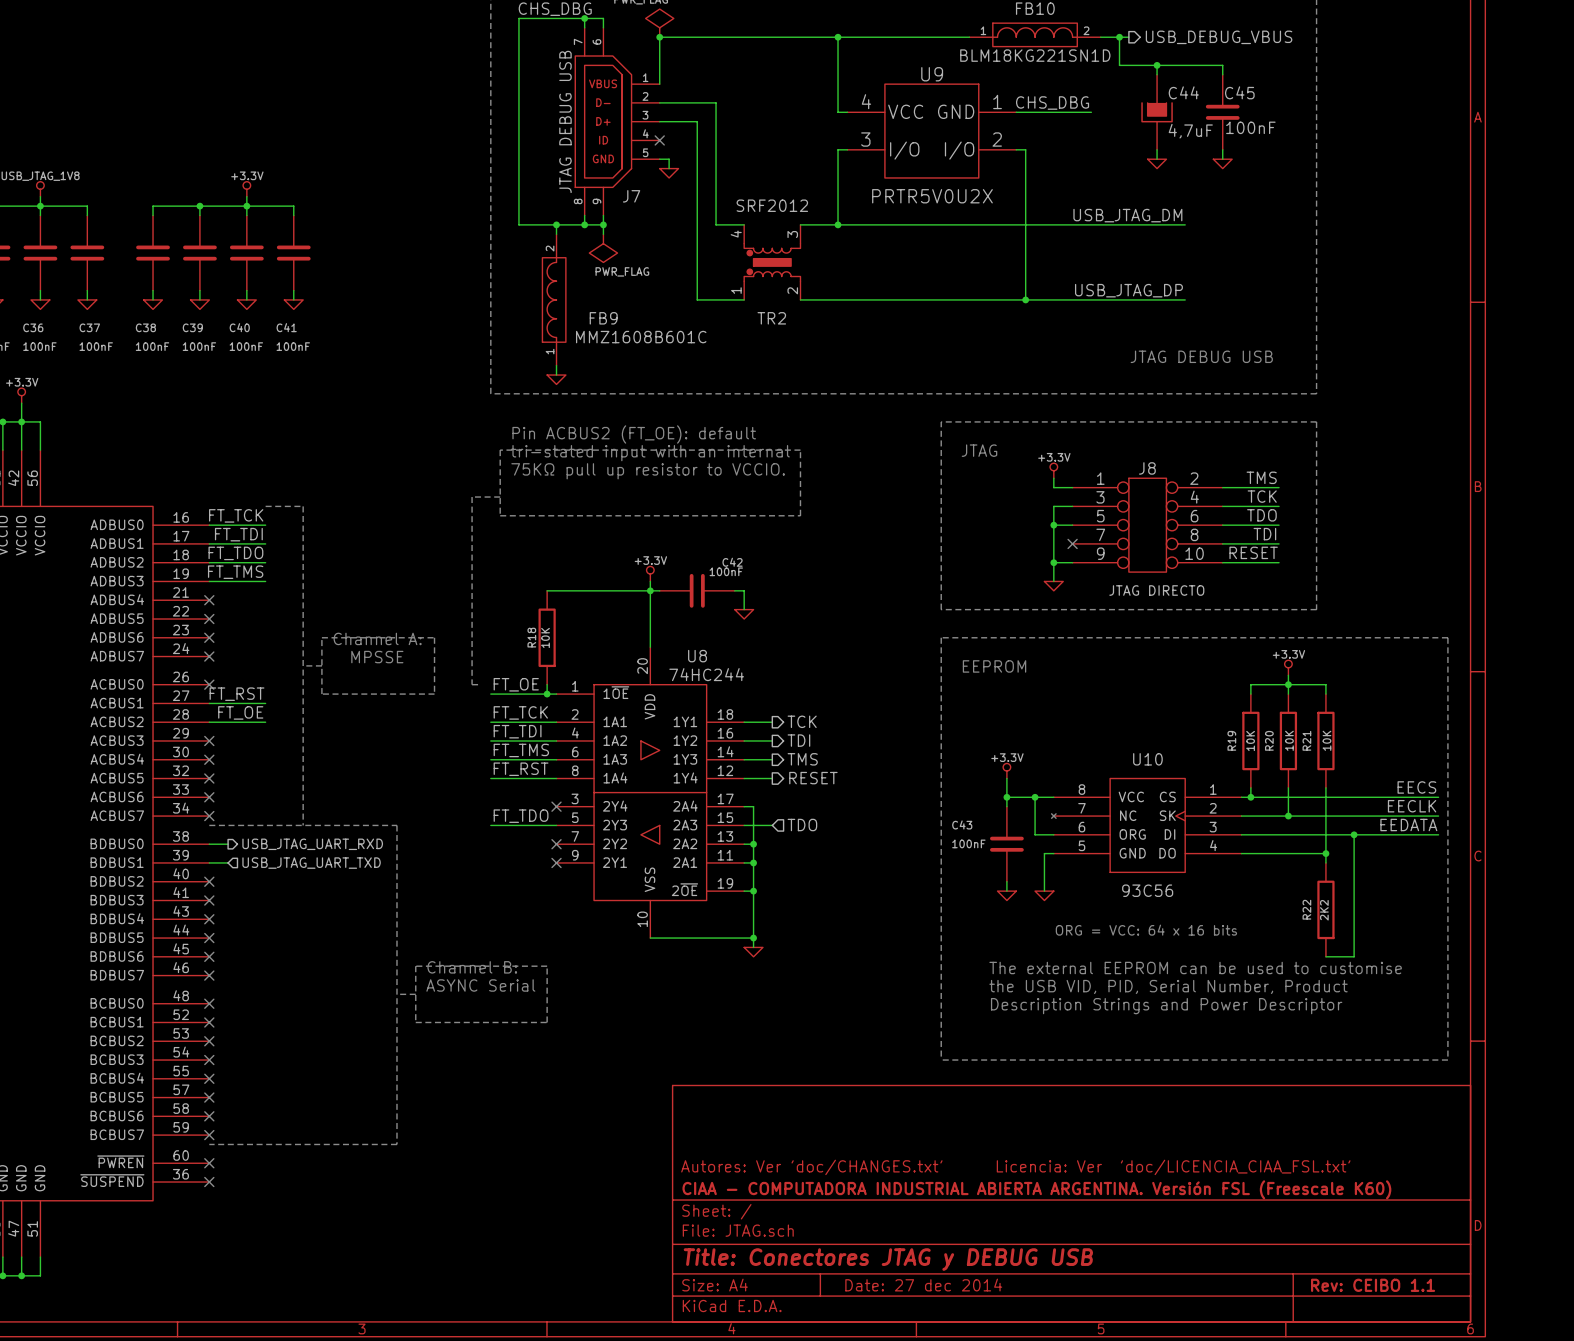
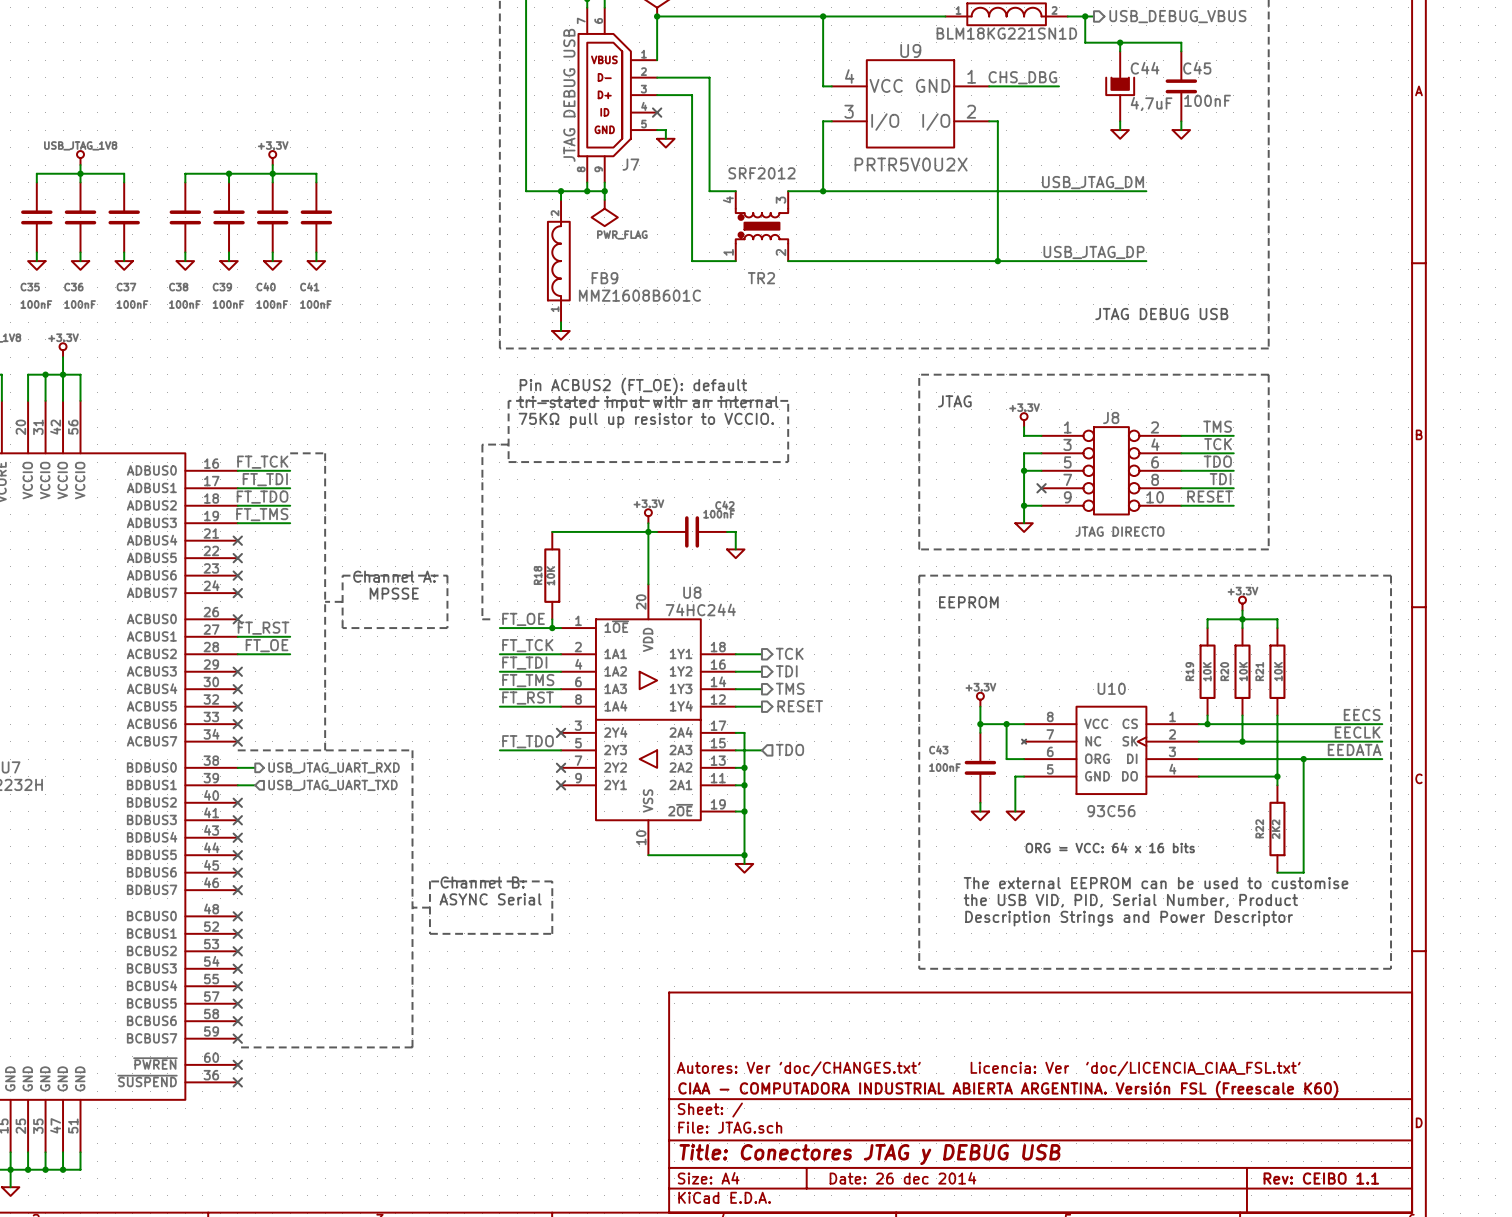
title block: Date: 27 dec 2014 (923, 1285) -> Date: 26 dec 2014 (902, 1178)

